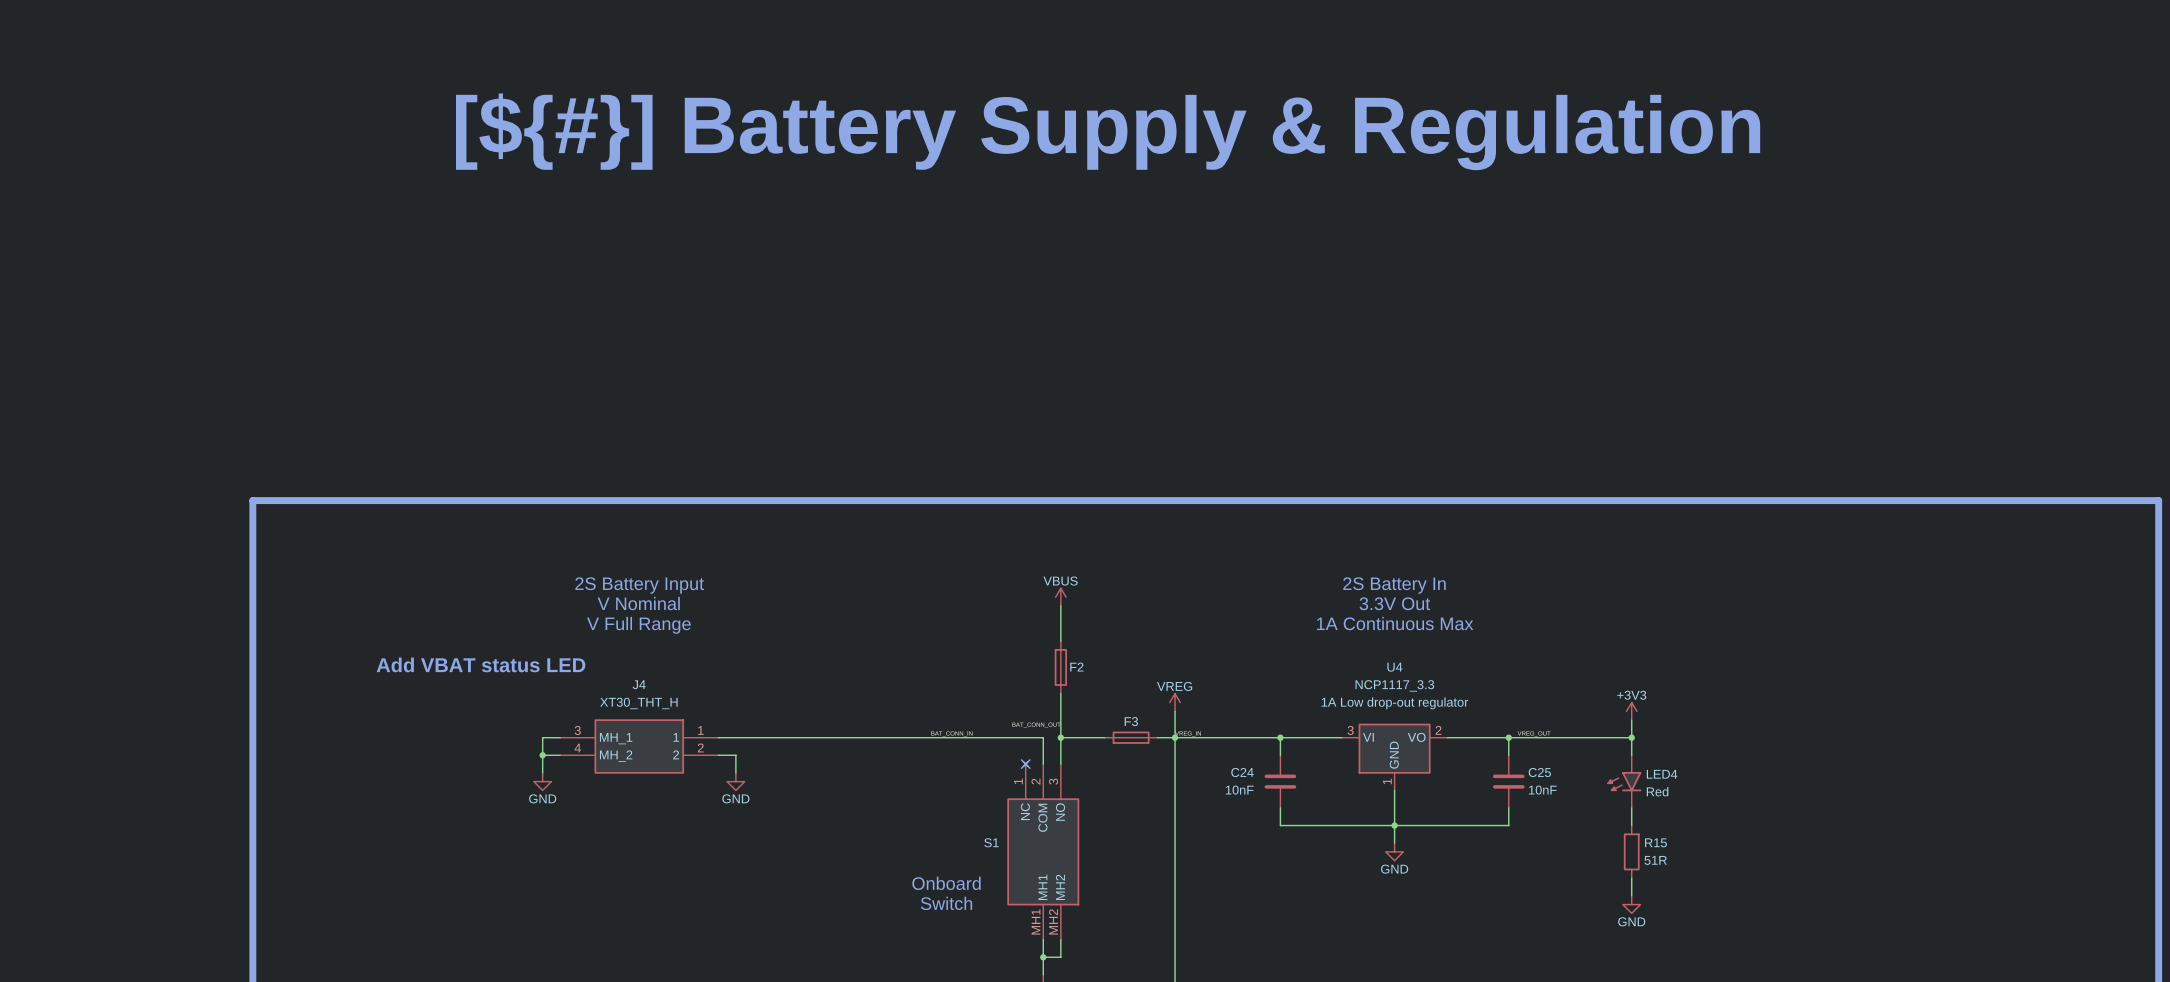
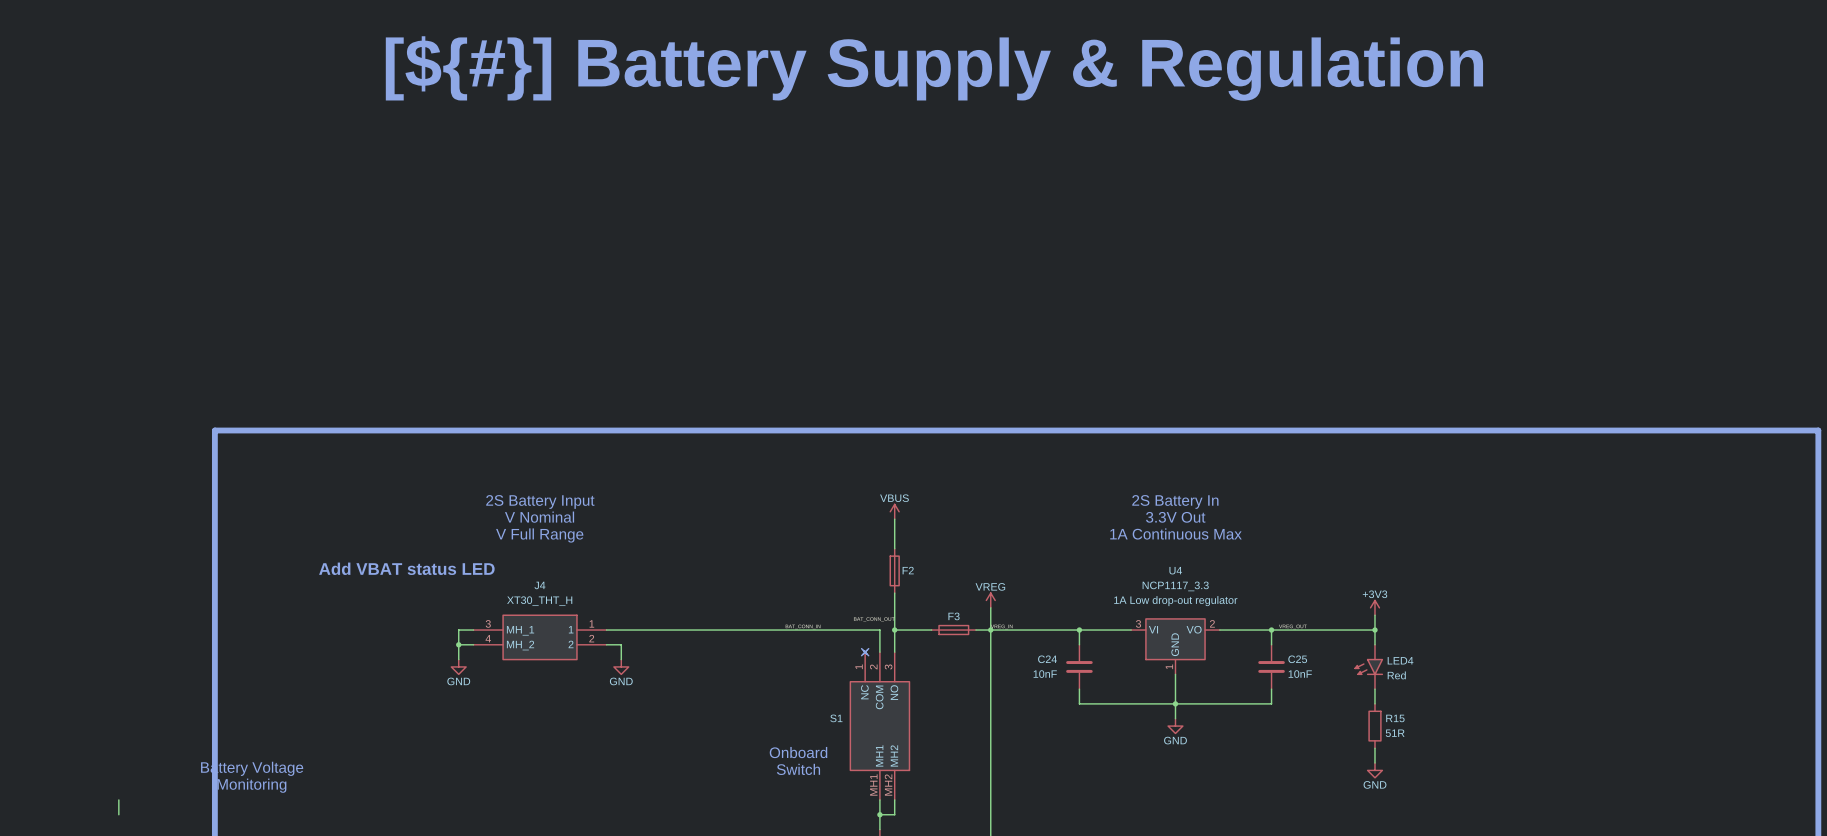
text position: [${#}] Battery Supply & Regulation (1108, 131) -> [${#}] Battery Supply & Regulation (934, 68)
text: none -> Battery Voltage (252, 768)
text: none -> Monitoring (251, 785)
wire: none -> (118, 799) (118, 814)

